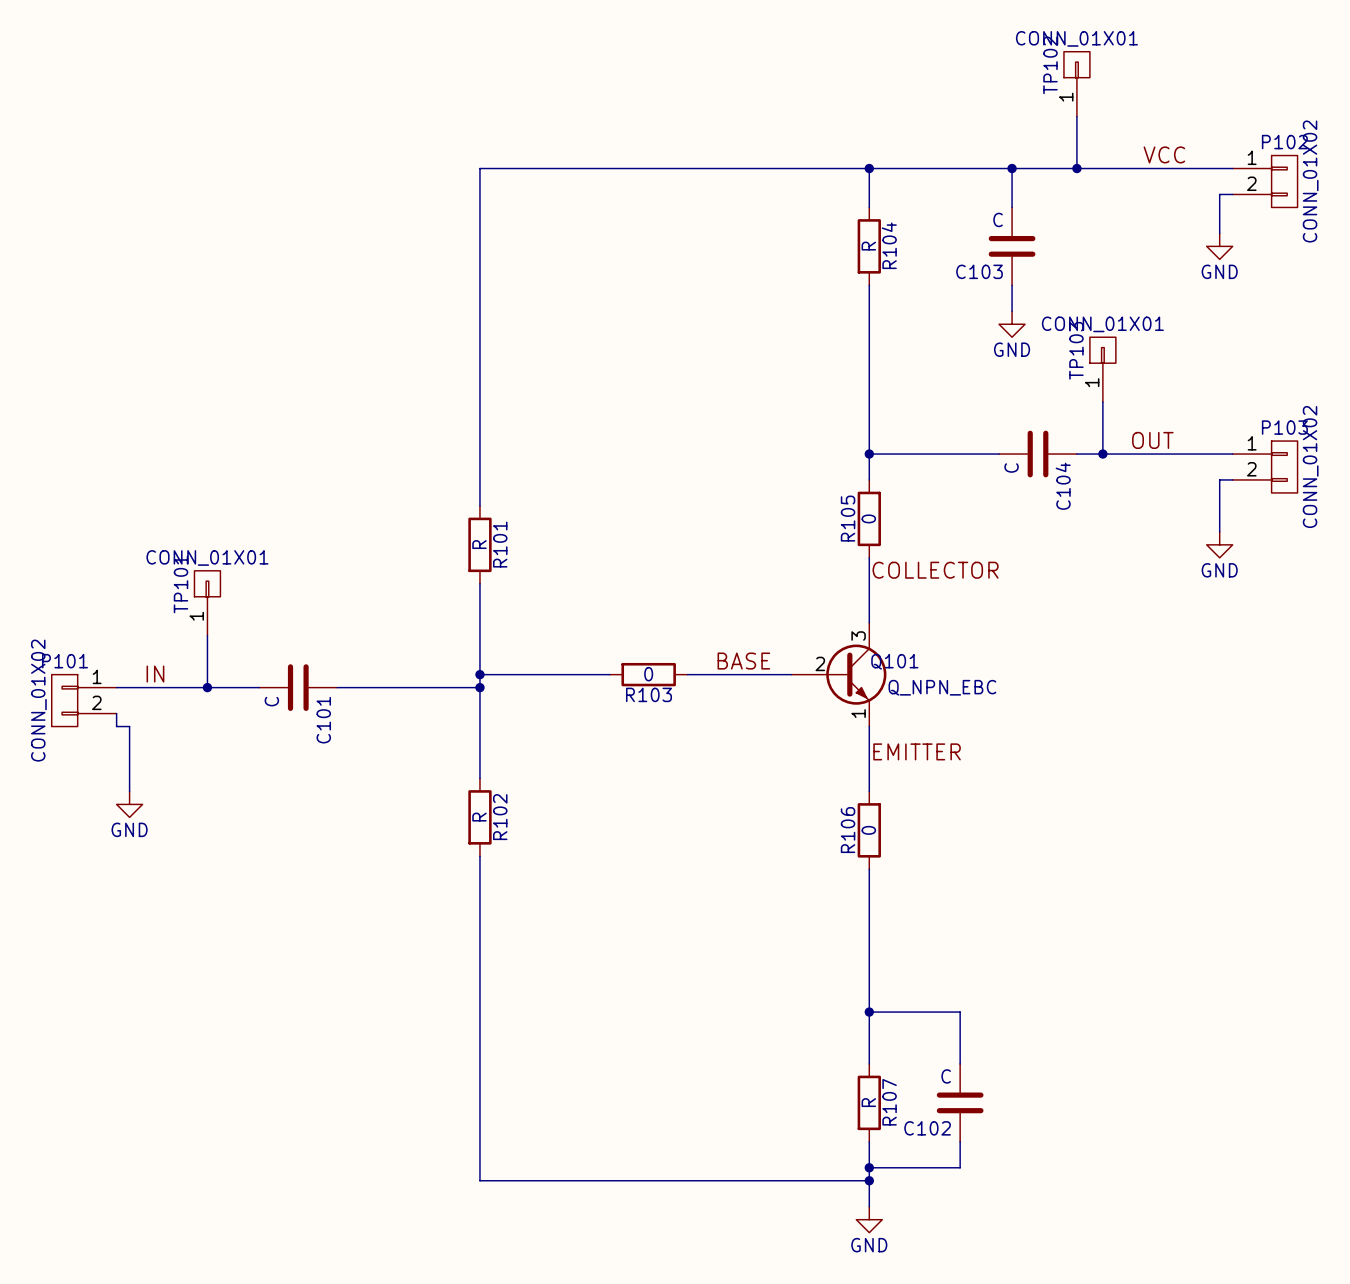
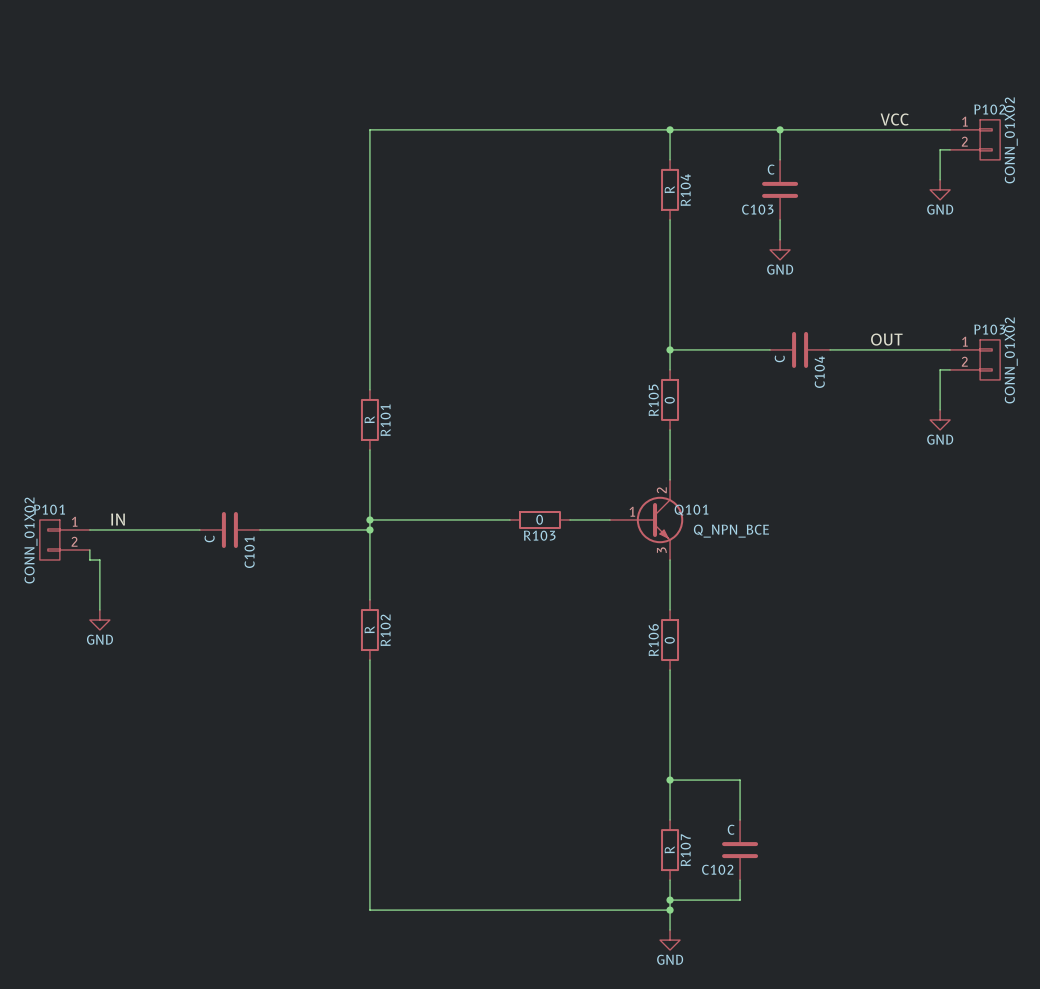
TP102: CONN_01X01 (1076, 84) -> none
wire: (1076, 116) (1076, 168) -> none
junction: (1076, 168) -> none
TP103: CONN_01X01 (1102, 369) -> none
wire: (1102, 402) (1102, 454) -> none
junction: (1102, 454) -> none
label: COLLECTOR (935, 570) -> none
TP101: CONN_01X01 (207, 603) -> none
wire: (207, 635) (207, 687) -> none
Q101 pin number: 3 (858, 636) -> 2 (661, 490)
label: BASE (743, 661) -> none
Q101 pin number: 2 (820, 663) -> 1 (632, 511)
R103 position: (648, 674) -> (540, 519)
wire: (687, 674) (739, 674) -> (469, 519) (509, 519)
junction: (207, 687) -> none
Q101 value: Q_NPN_EBC (942, 687) -> Q_NPN_BCE (731, 531)
Q101 pin number: 1 (858, 713) -> 3 (661, 550)
label: EMITTER (917, 751) -> none

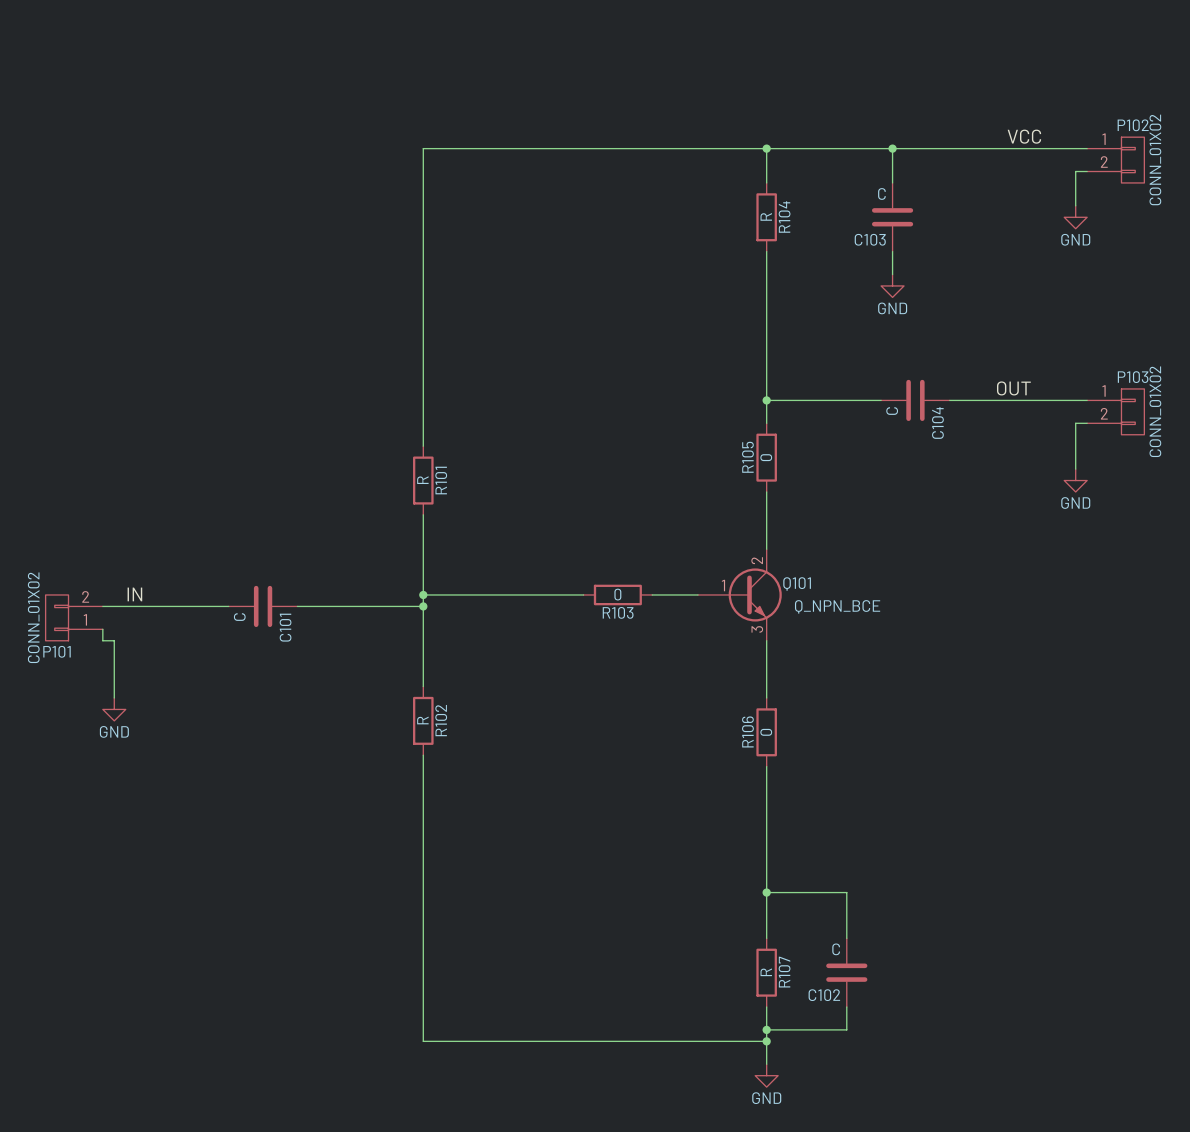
P101 flip: as is (49, 540) -> up-down (57, 617)

